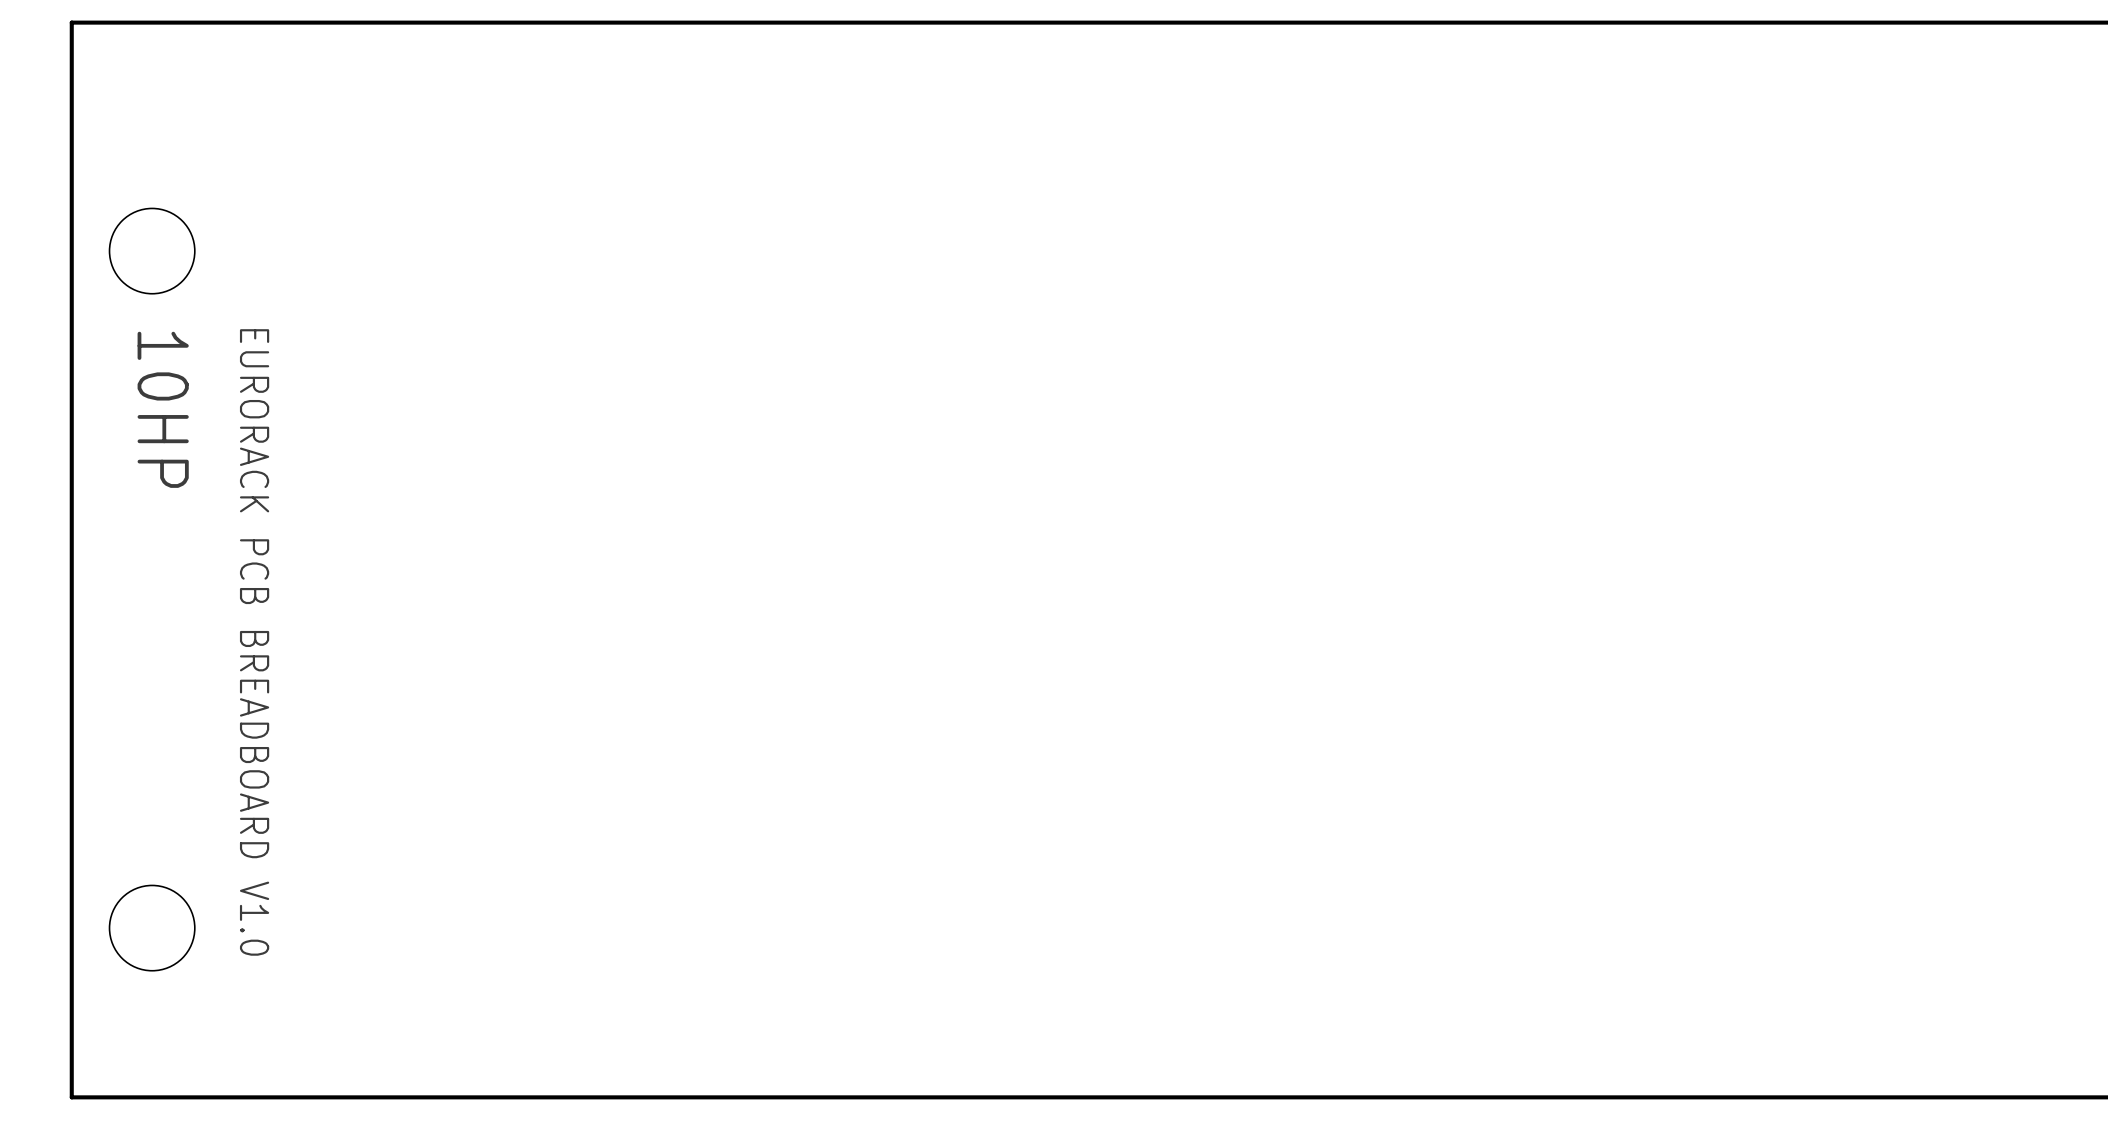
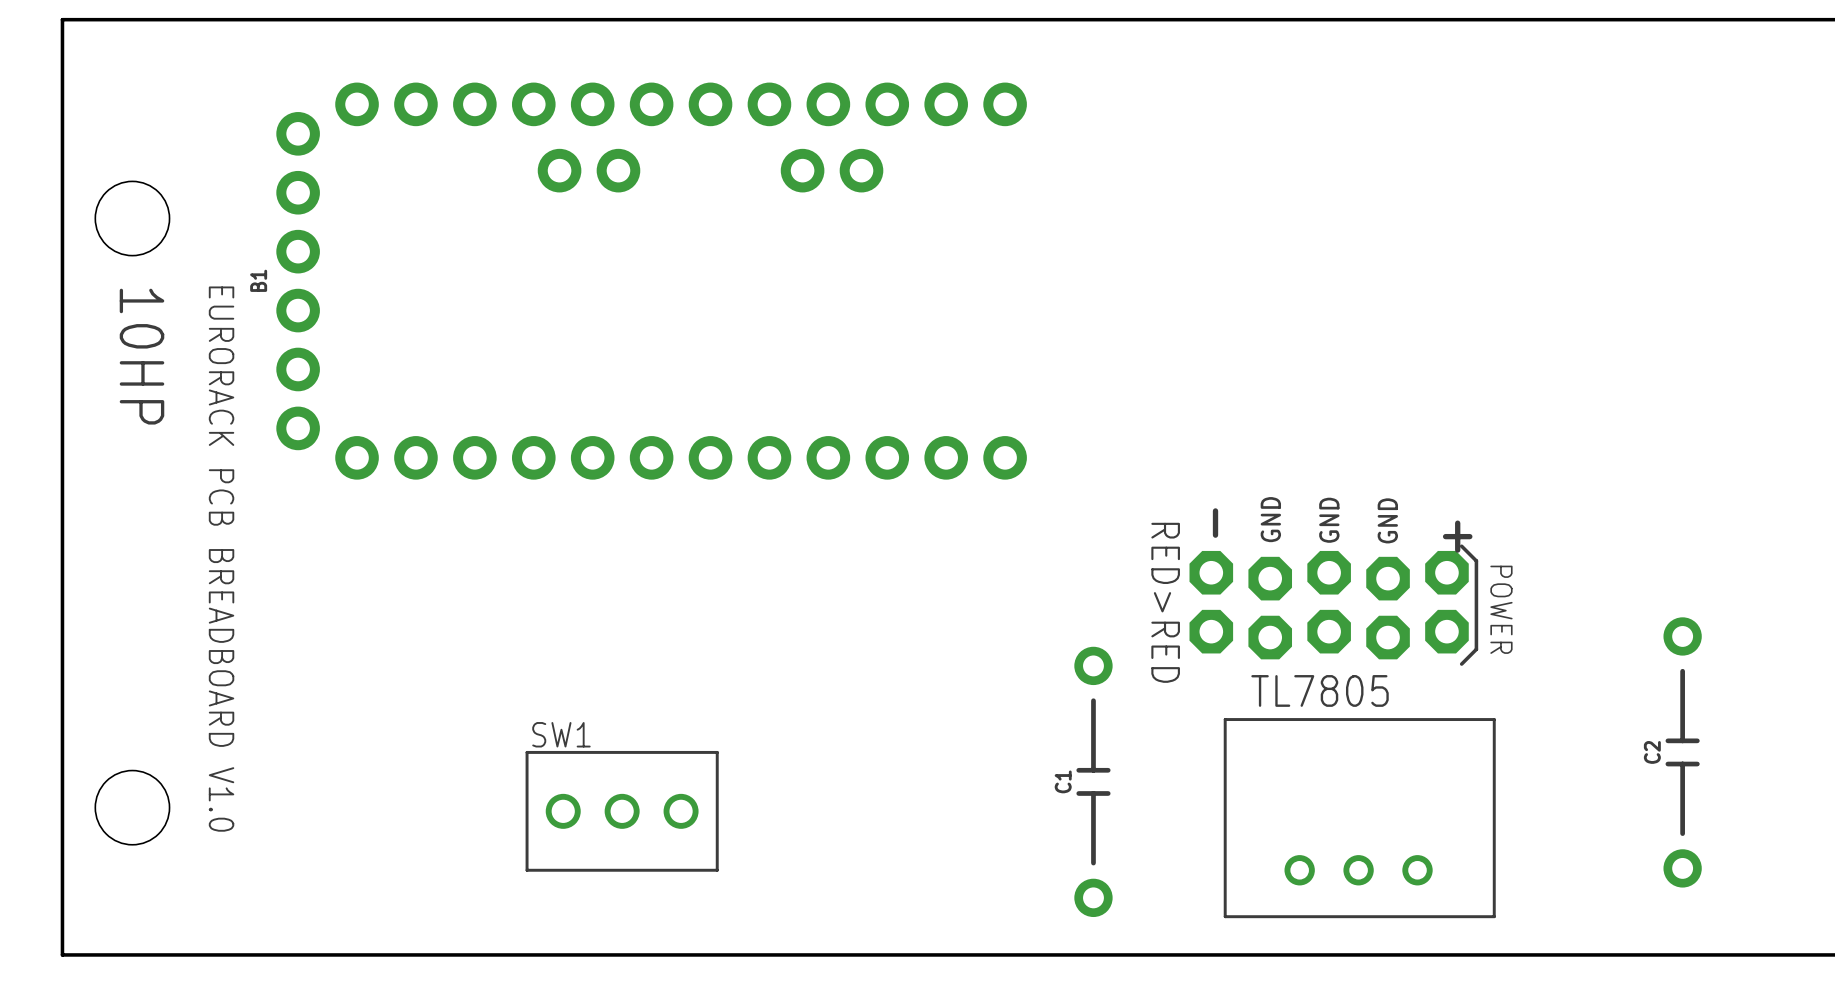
B1: none -> (651, 281)
part: none -> (1333, 605)
C2: none -> (1682, 752)
C1: none -> (1093, 781)
SW1: none -> (622, 811)
TL7805: none -> (1359, 818)

